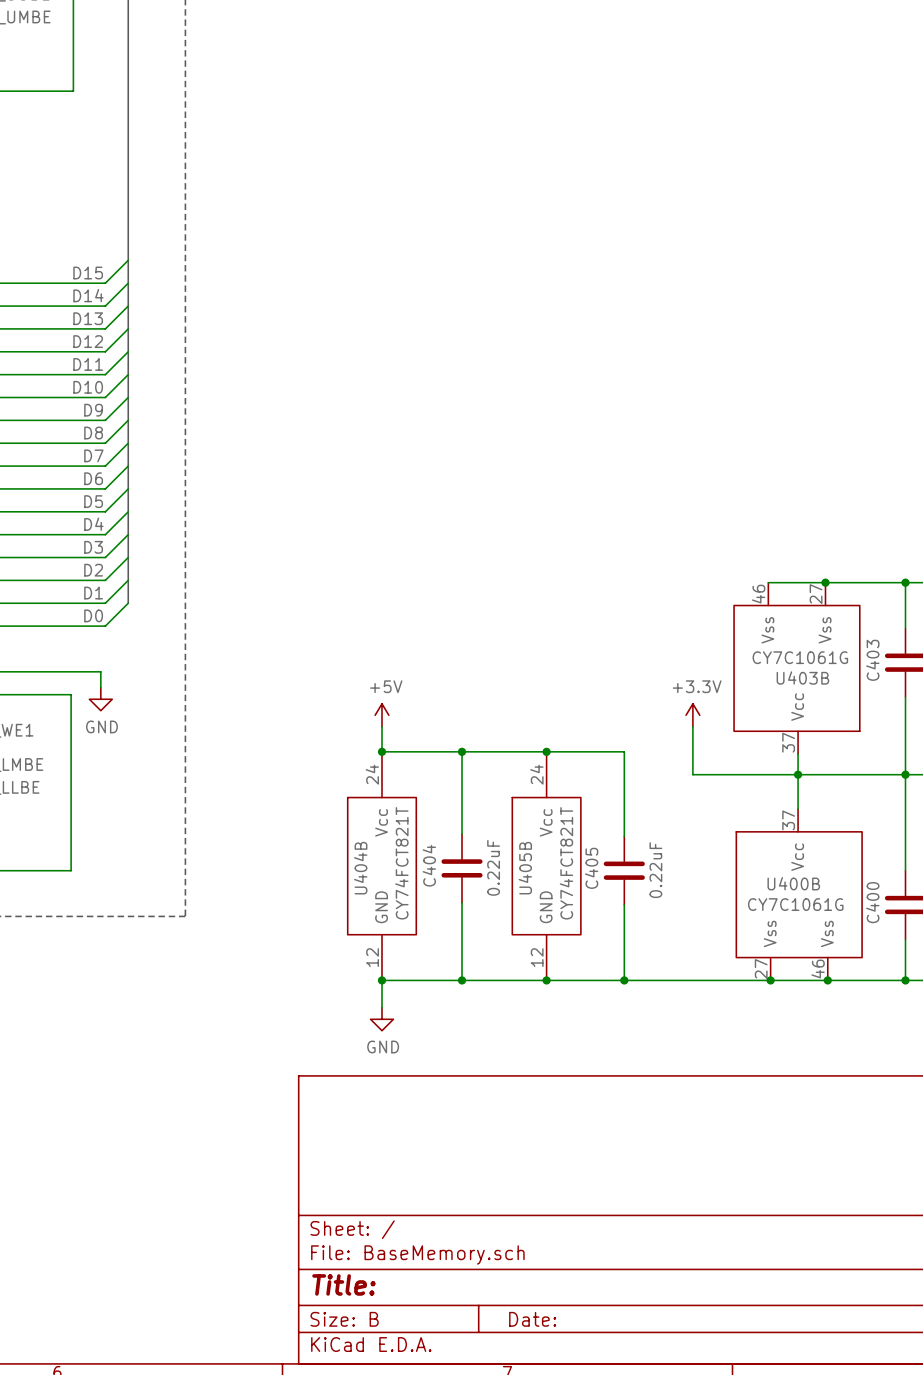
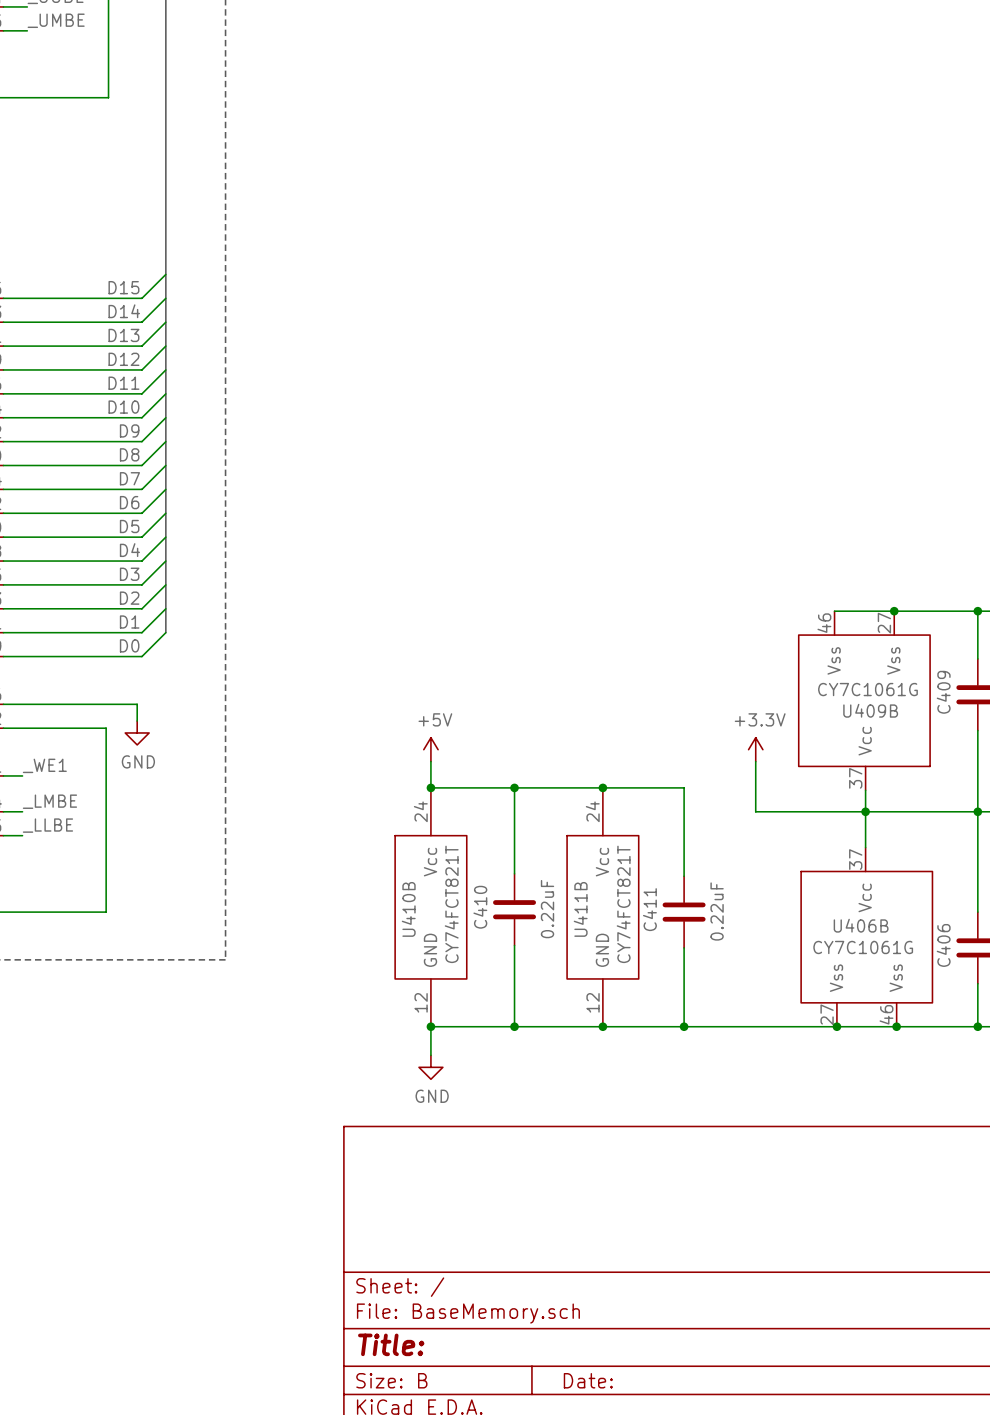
C403 name: C403 (872, 660) -> C409 (943, 692)
U403B name: U403B (802, 677) -> U409B (870, 710)
C404 name: C404 (429, 865) -> C410 (480, 907)
U404B name: U404B (360, 868) -> U410B (408, 909)
U405B name: U405B (525, 868) -> U411B (580, 909)
C405 name: C405 (591, 868) -> C411 (649, 909)
U400B name: U400B (793, 883) -> U406B (861, 925)
C400 name: C400 (872, 902) -> C406 (943, 945)

